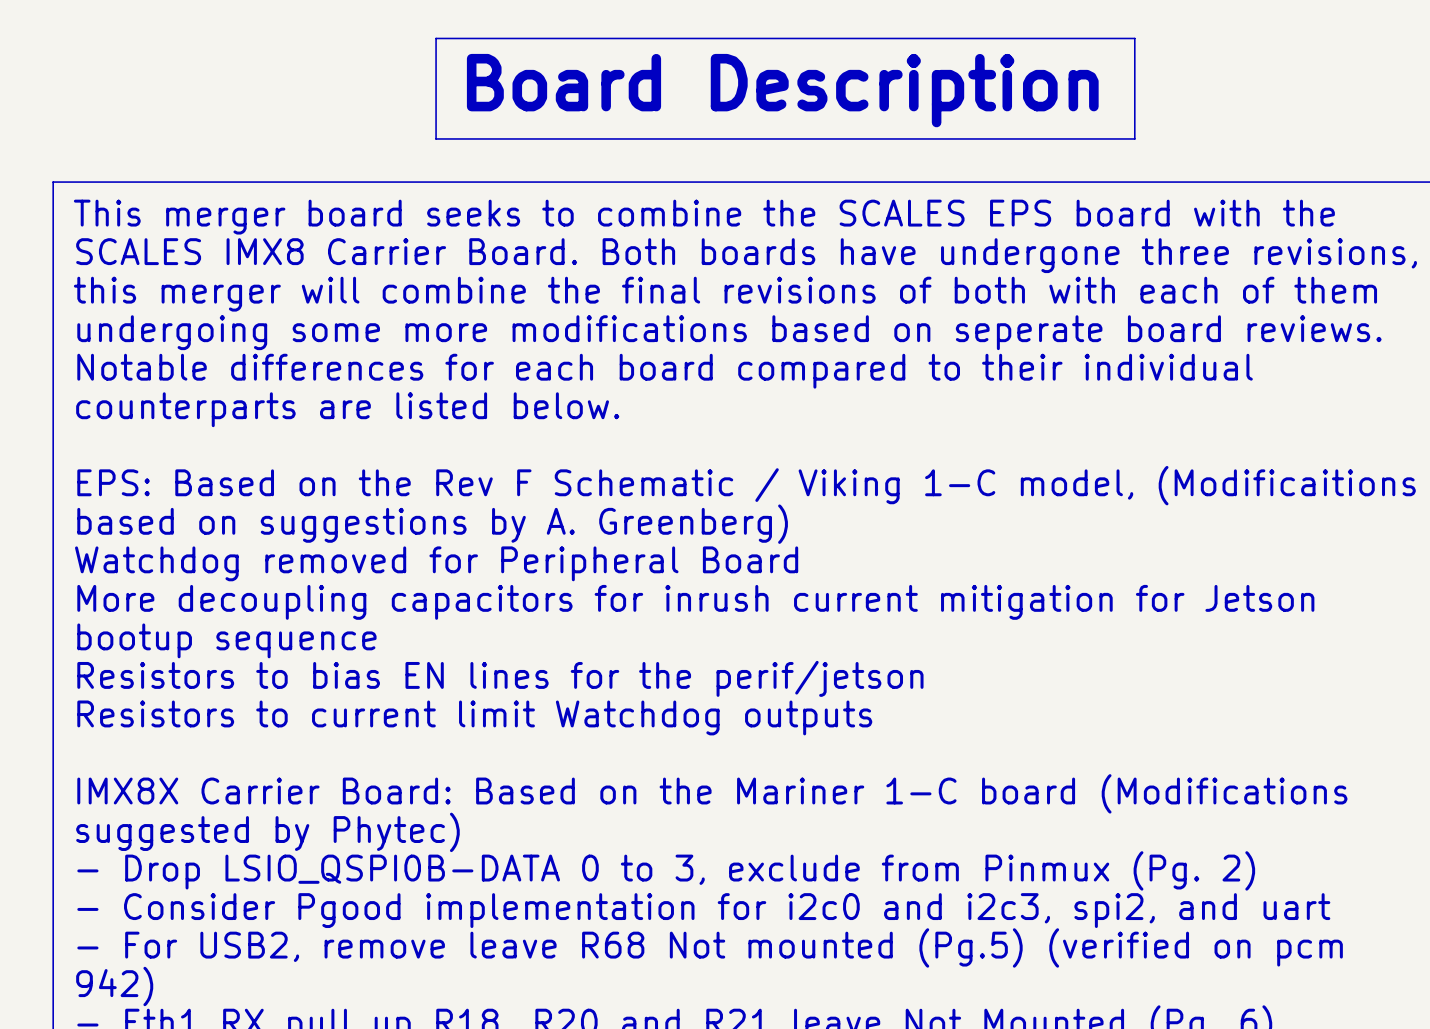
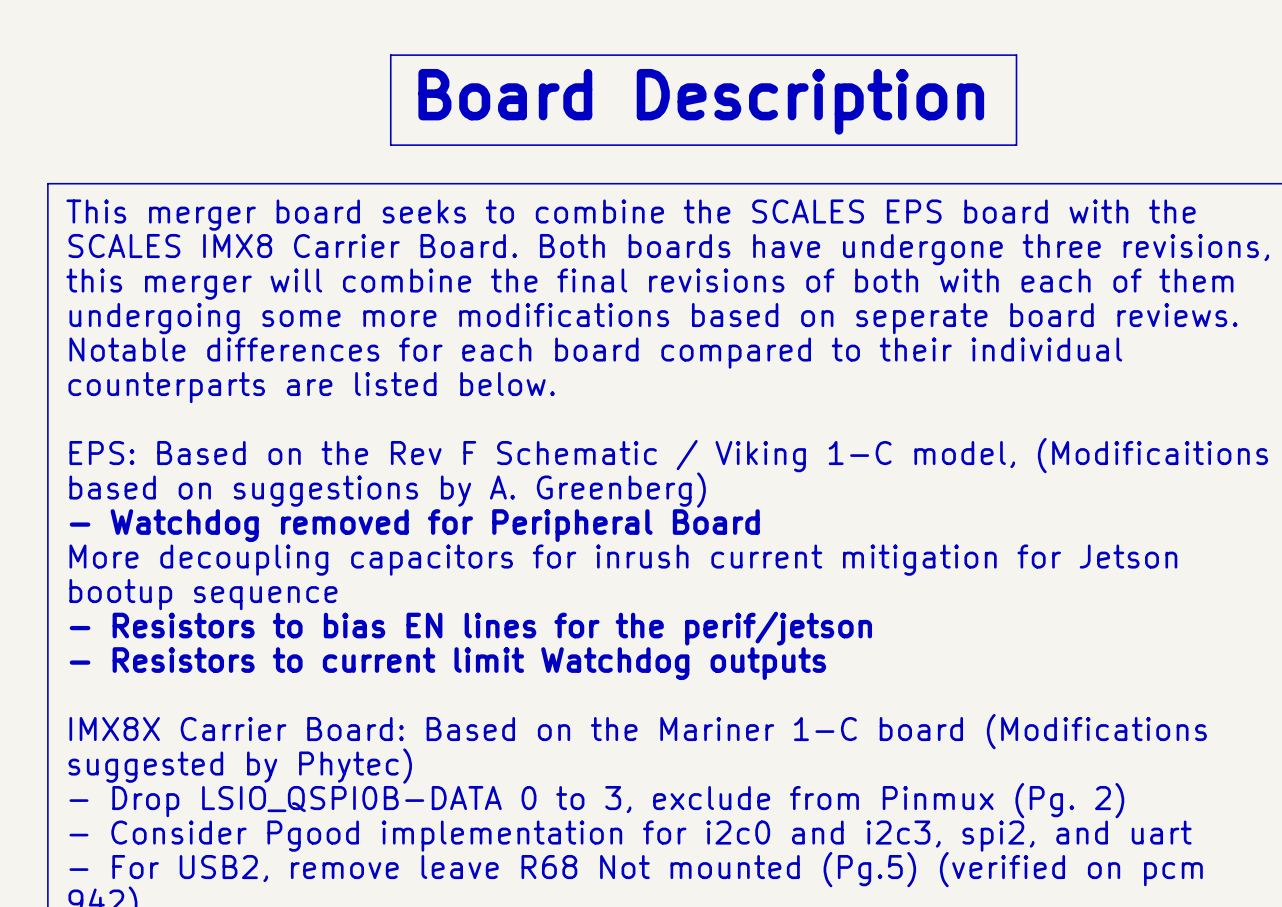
text: Watchdog removed for Peripheral Board (436, 563) -> - Watchdog removed for Peripheral Board (414, 525)
text: Resistors to bias EN lines for the perif/jetson (500, 678) -> - Resistors to bias EN lines for the perif/jetson (470, 628)
text: Resistors to current limit Watchdog outputs (474, 717) -> - Resistors to current limit Watchdog outputs (447, 663)

